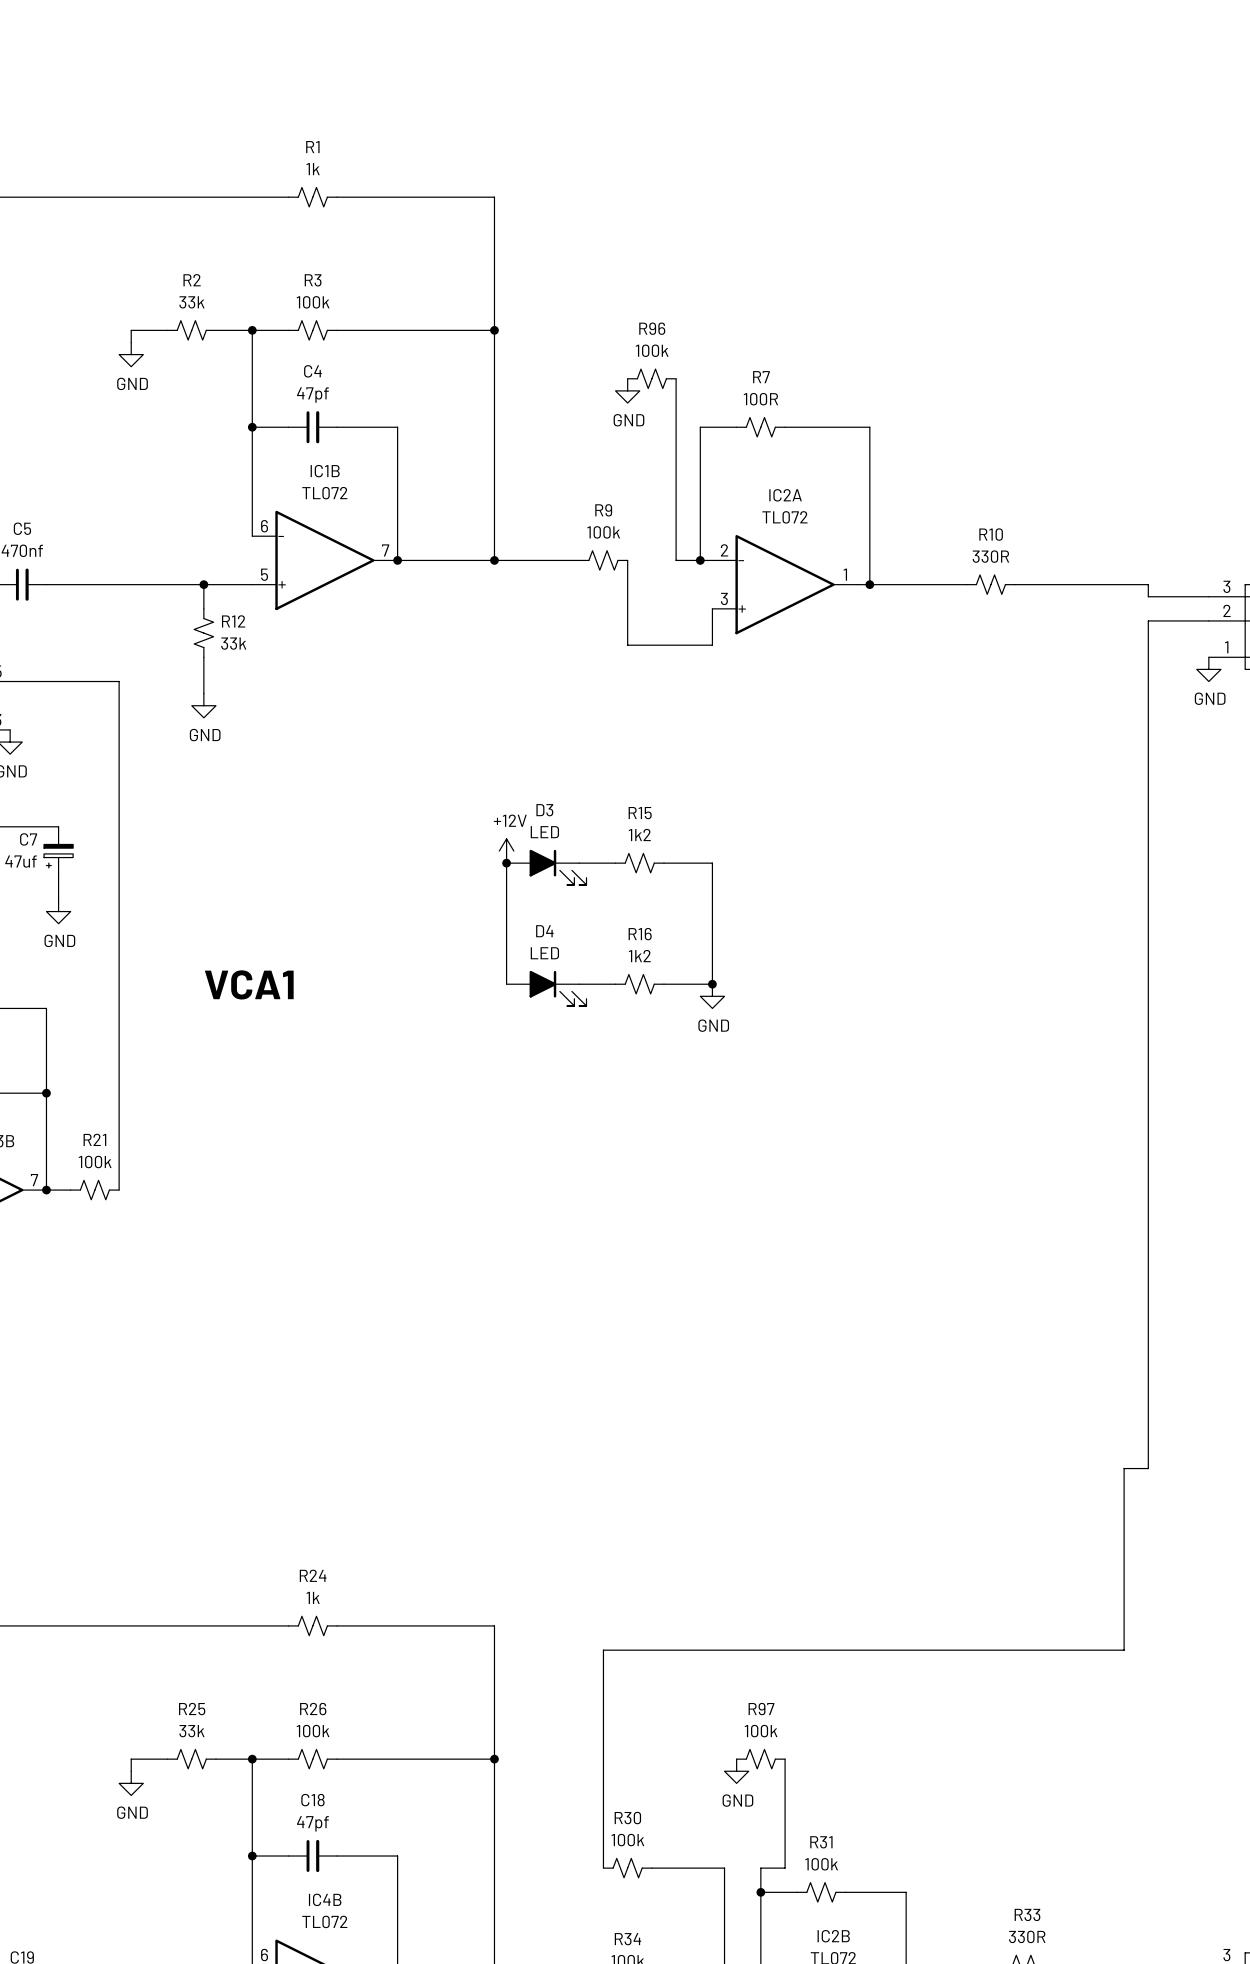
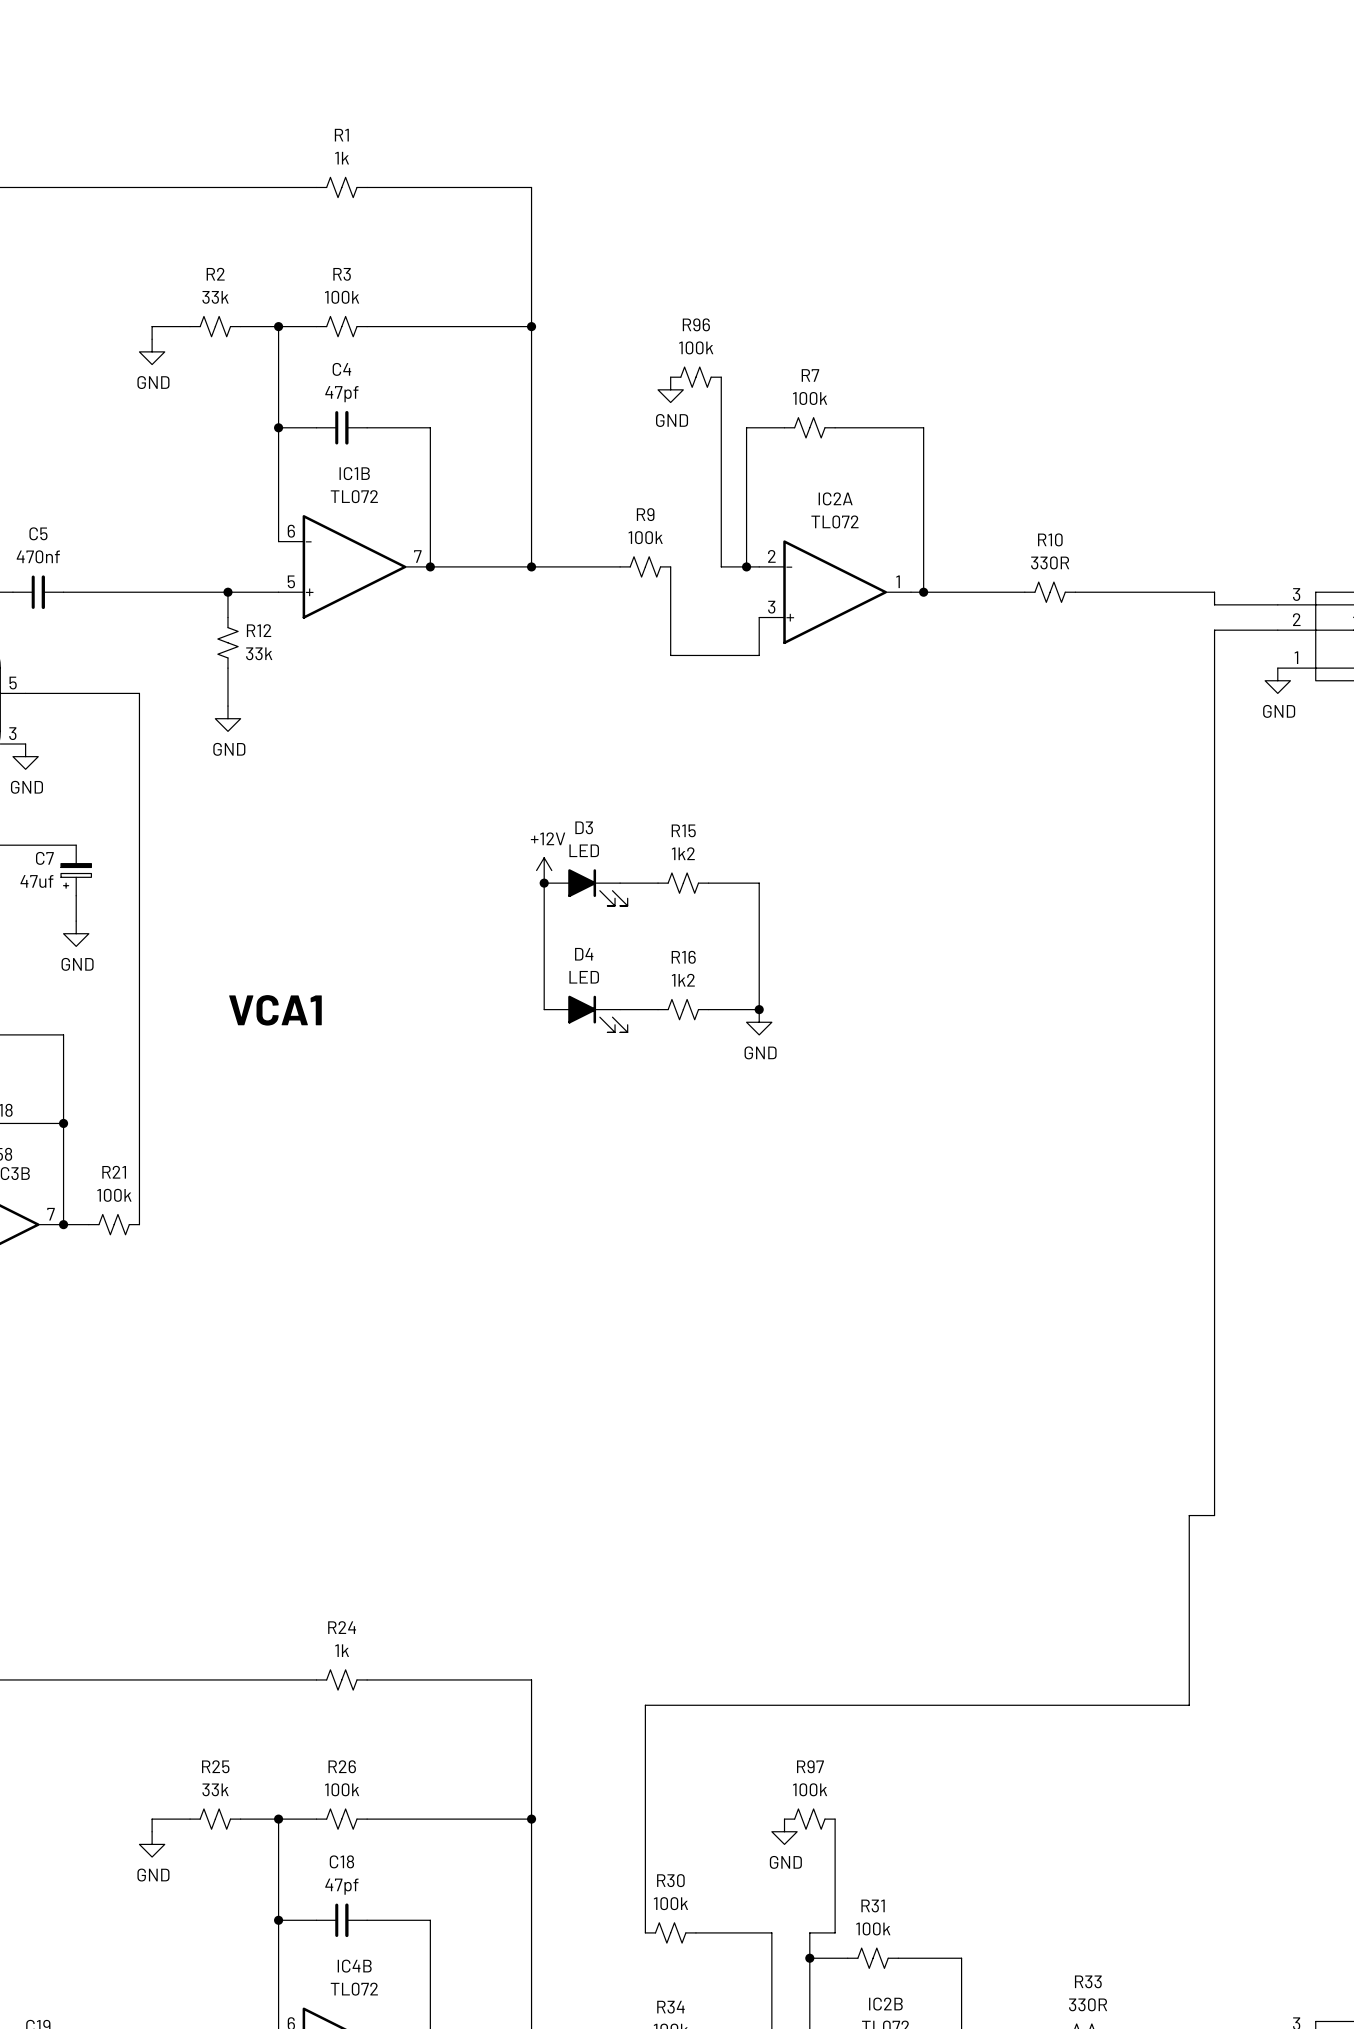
R7 value: 100R (760, 399) -> 100k (810, 398)

